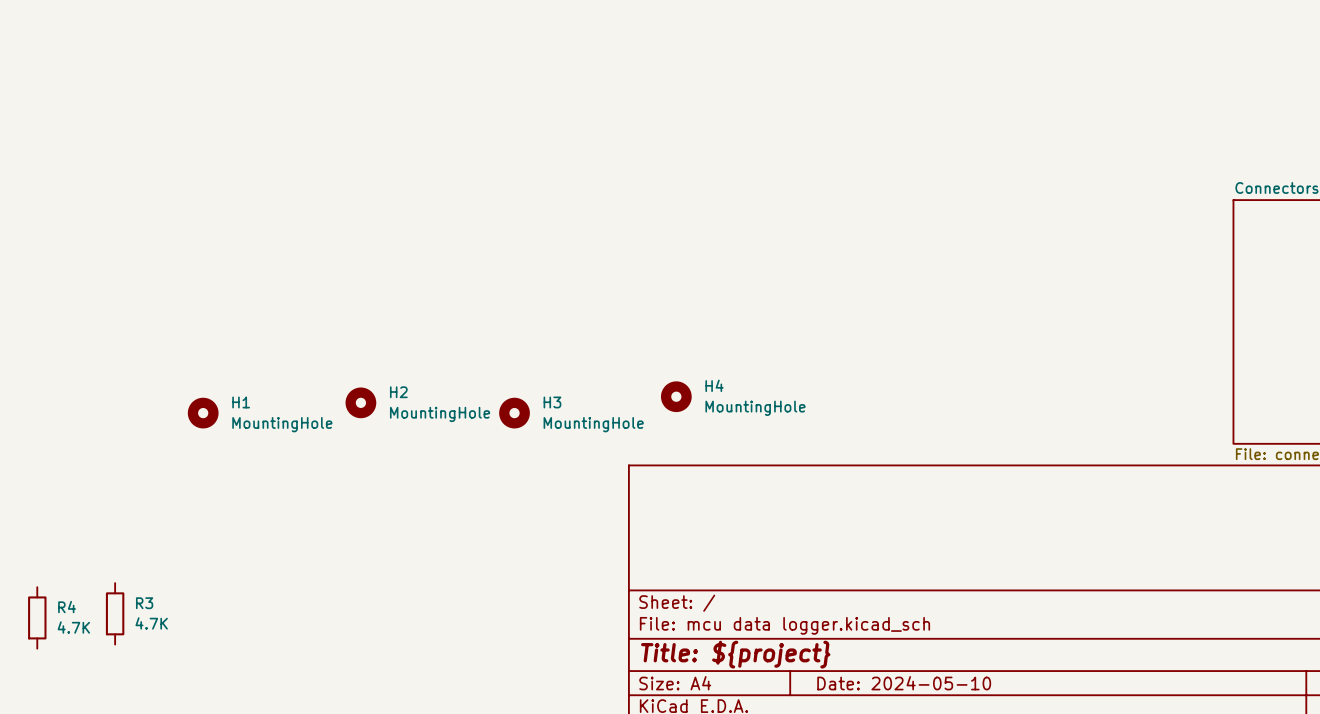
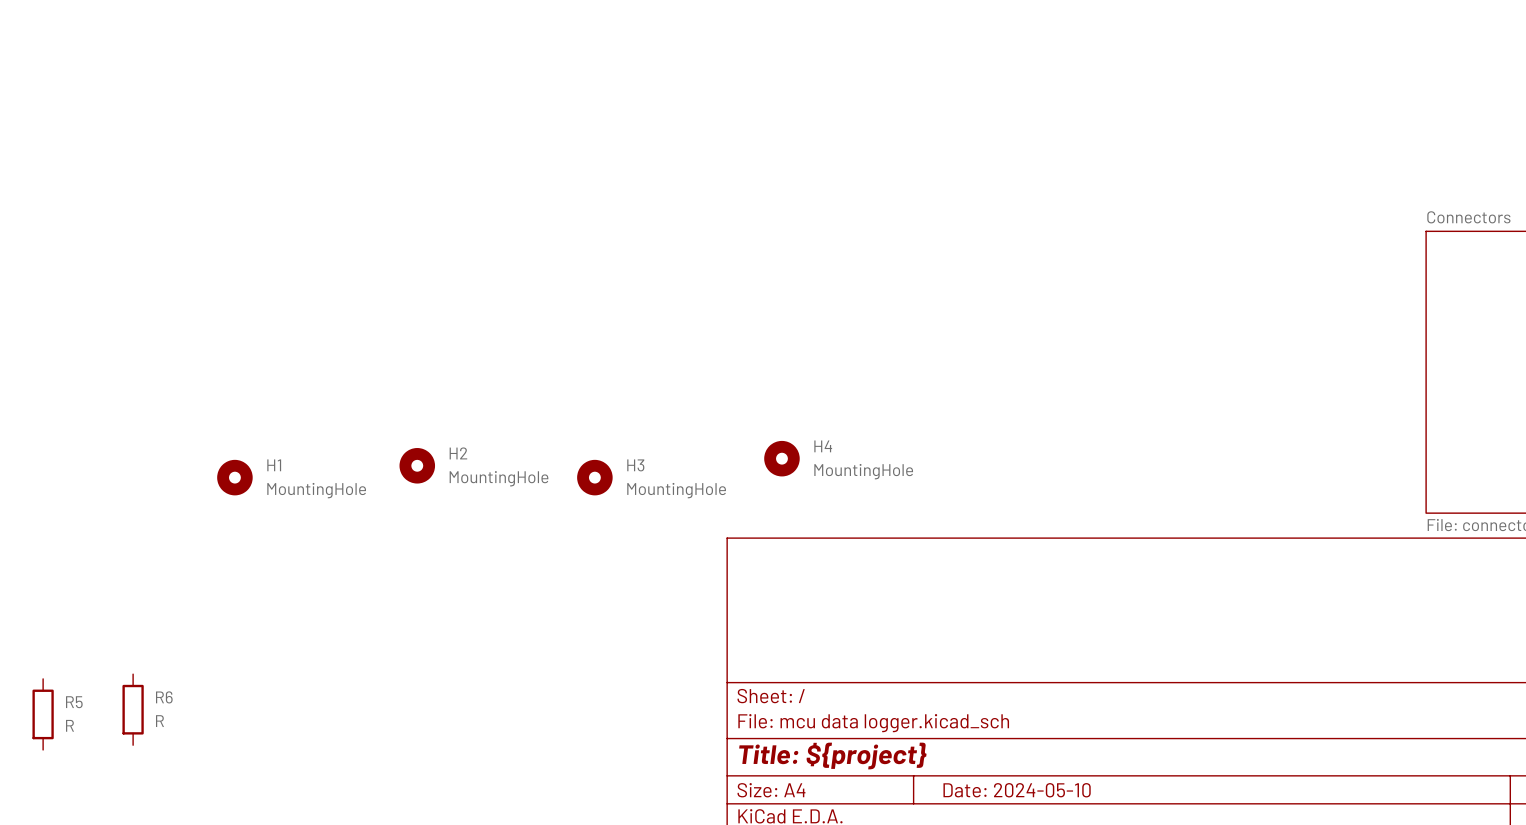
R3 name: R3 (144, 603) -> R6 (164, 697)
R4 name: R4 (67, 607) -> R5 (74, 702)
R3 value: 4.7K (151, 623) -> R (159, 721)
R4 value: 4.7K (73, 627) -> R (69, 725)

